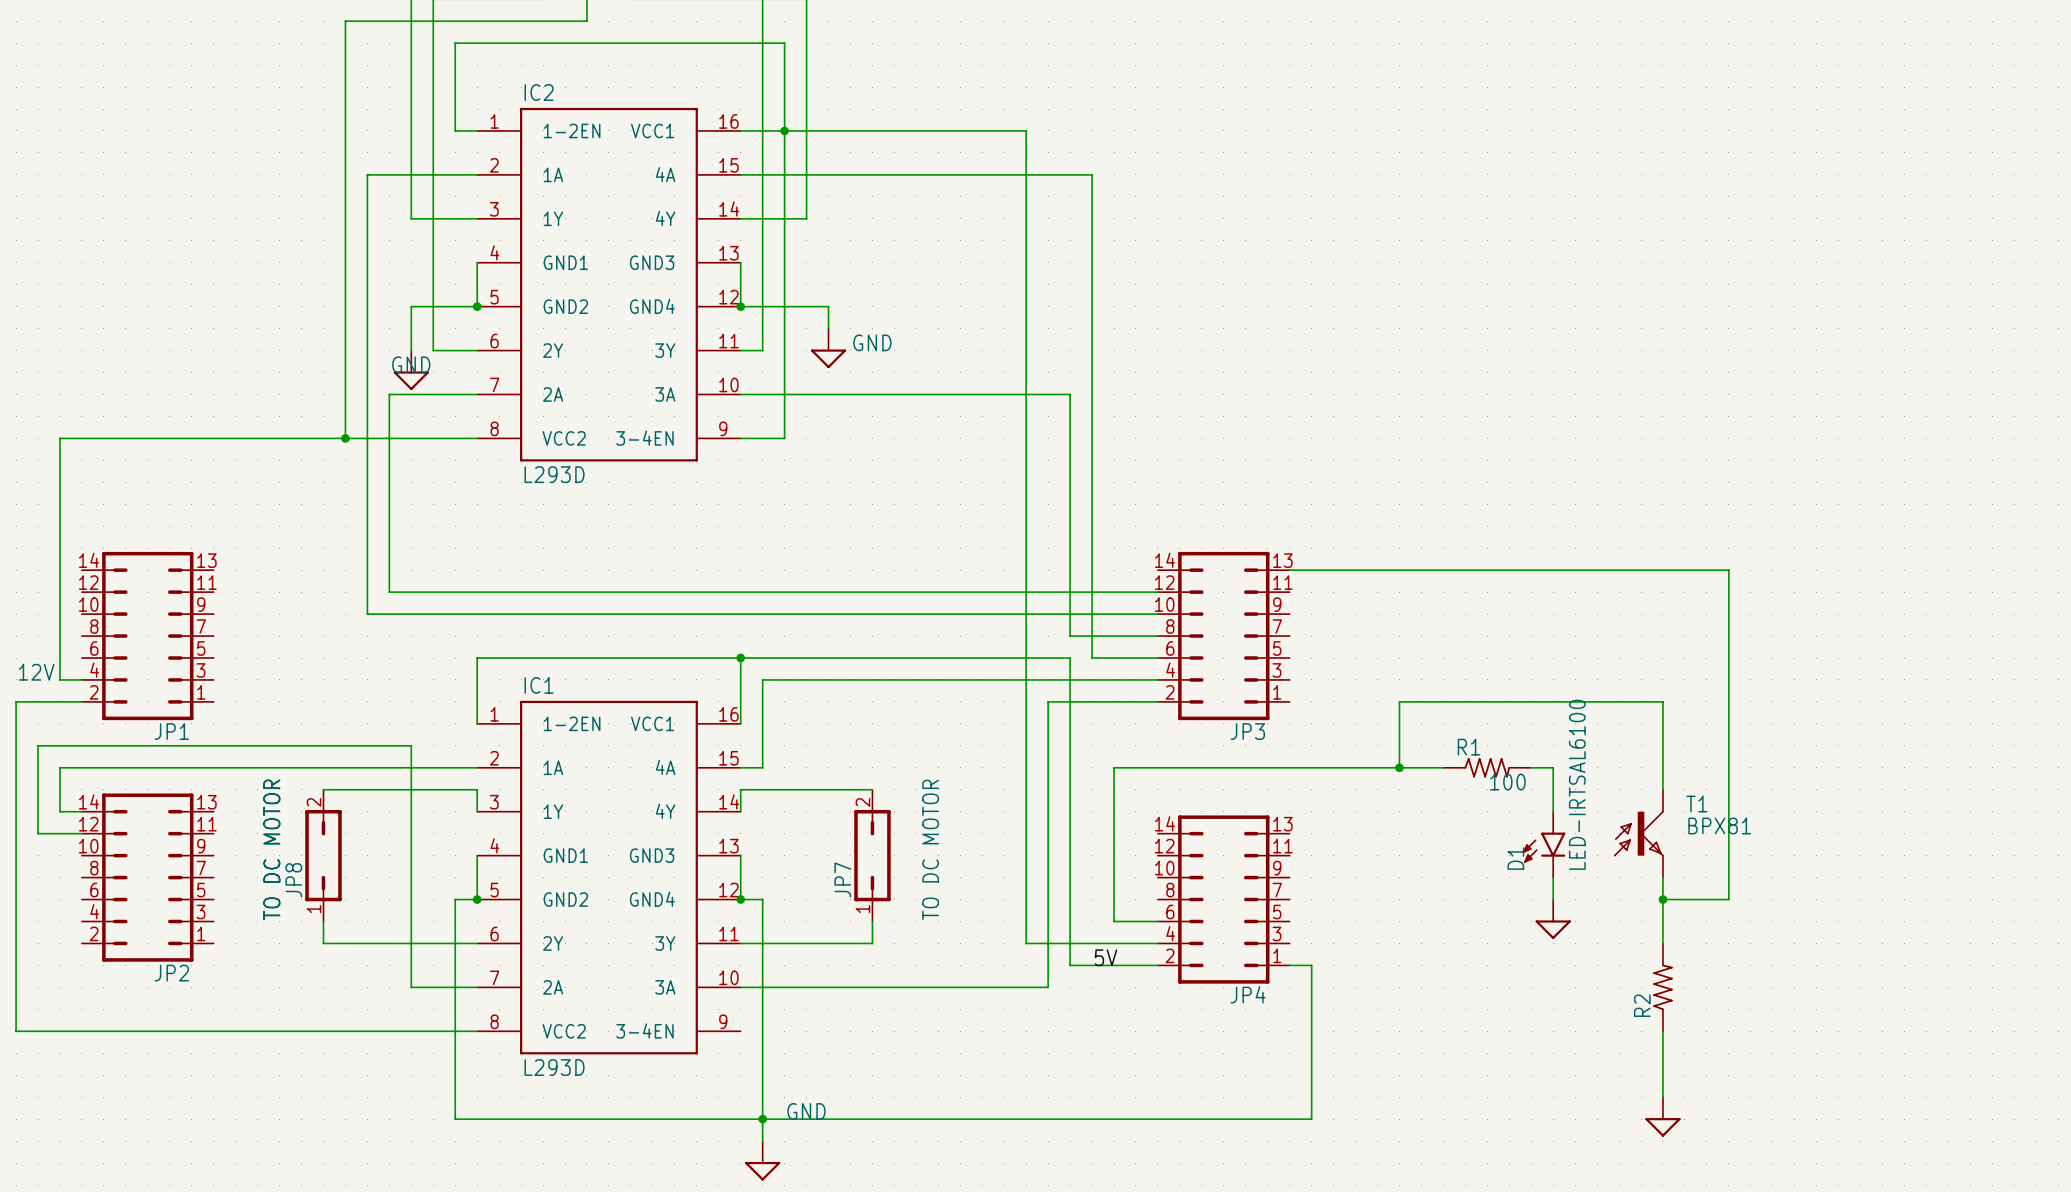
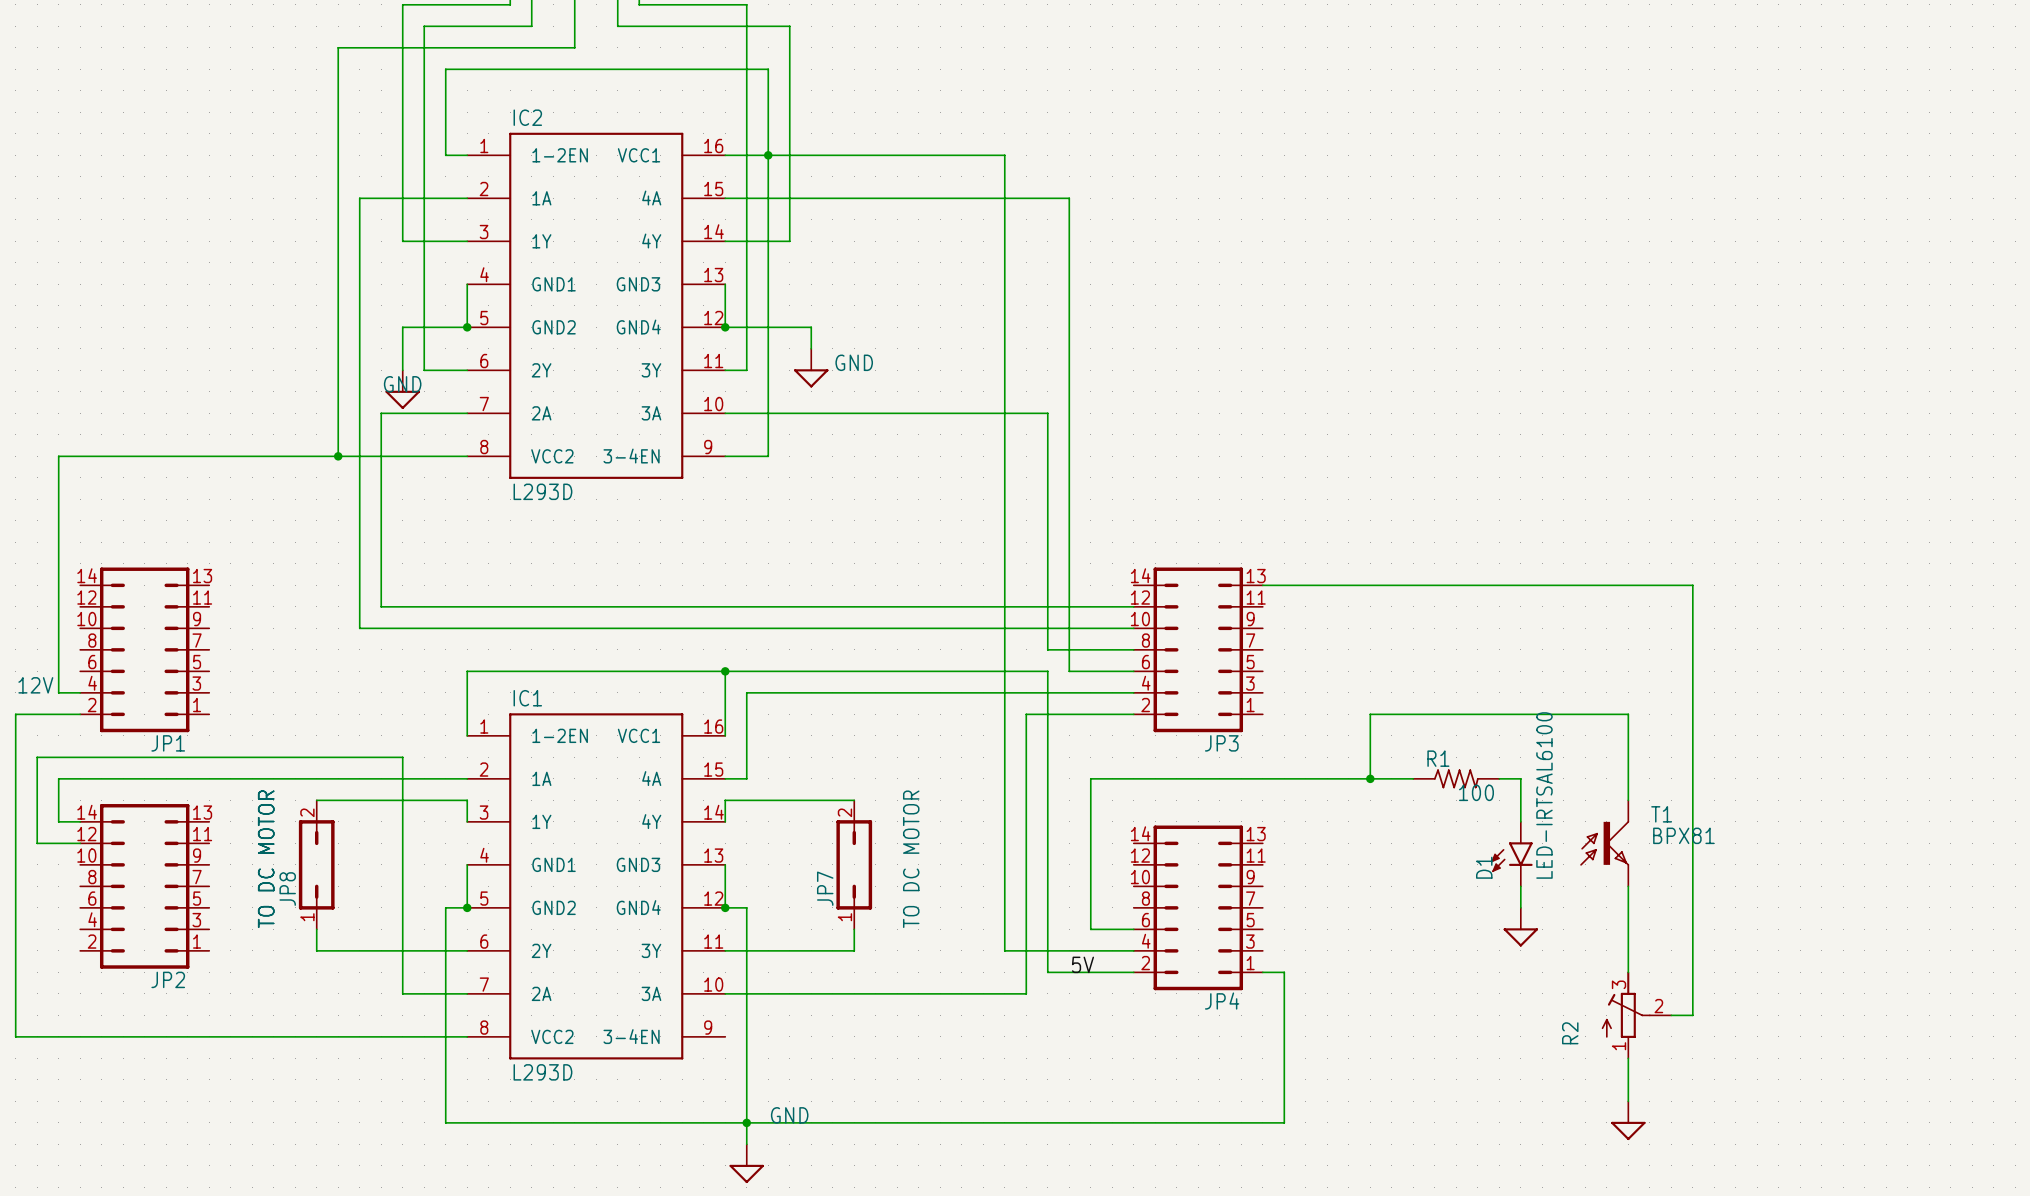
wire: (1662, 899) (1728, 899) -> (1671, 1015) (1692, 1015) (1692, 907)
junction: (1662, 899) -> none
R2 symbol: [1653, 943, 1673, 1032] -> [1601, 971, 1672, 1059]
R2 name position: R2 (1642, 1005) -> R2 (1570, 1033)

